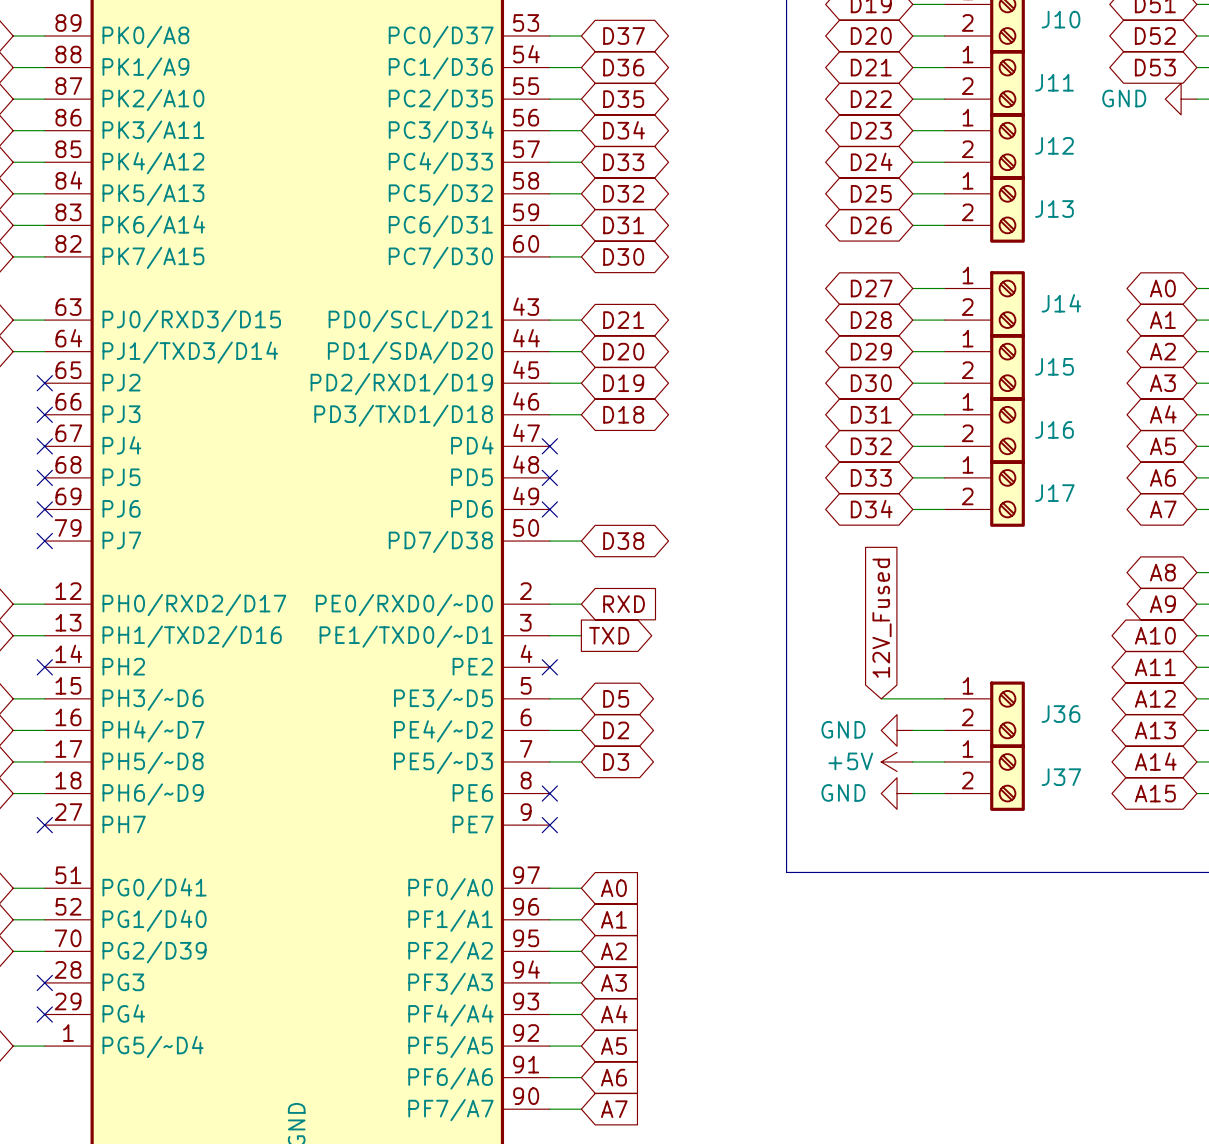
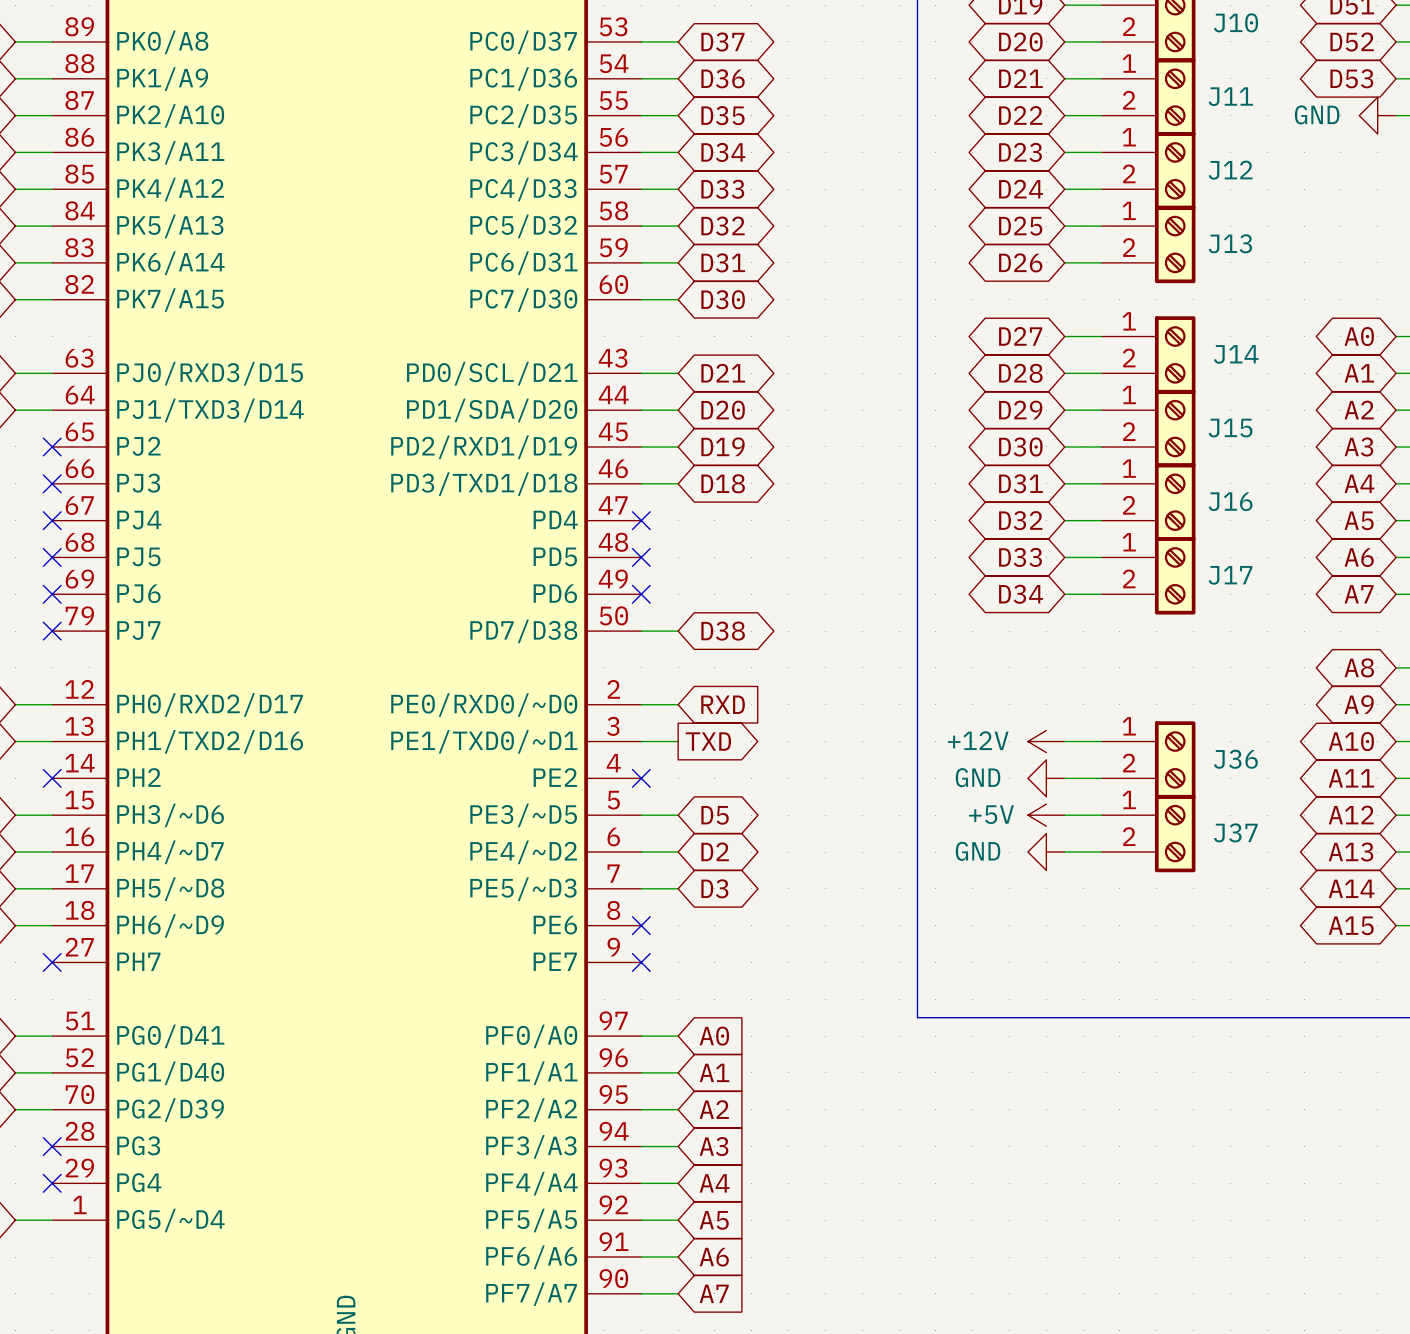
global label: 12V_Fused (882, 618) -> none
power symbol: none -> +12V (1046, 741)
J36: none -> (1148, 759)
J36 name: J36 (1060, 714) -> J37 (1235, 832)
power symbol position: +5V (897, 761) -> +5V (1046, 815)
wire: (912, 761) (944, 761) -> (1064, 741) (1101, 741)
J37: (984, 777) -> none
power symbol position: GND (897, 793) -> GND (1046, 778)
wire: (912, 793) (944, 793) -> (1064, 778) (1101, 778)

